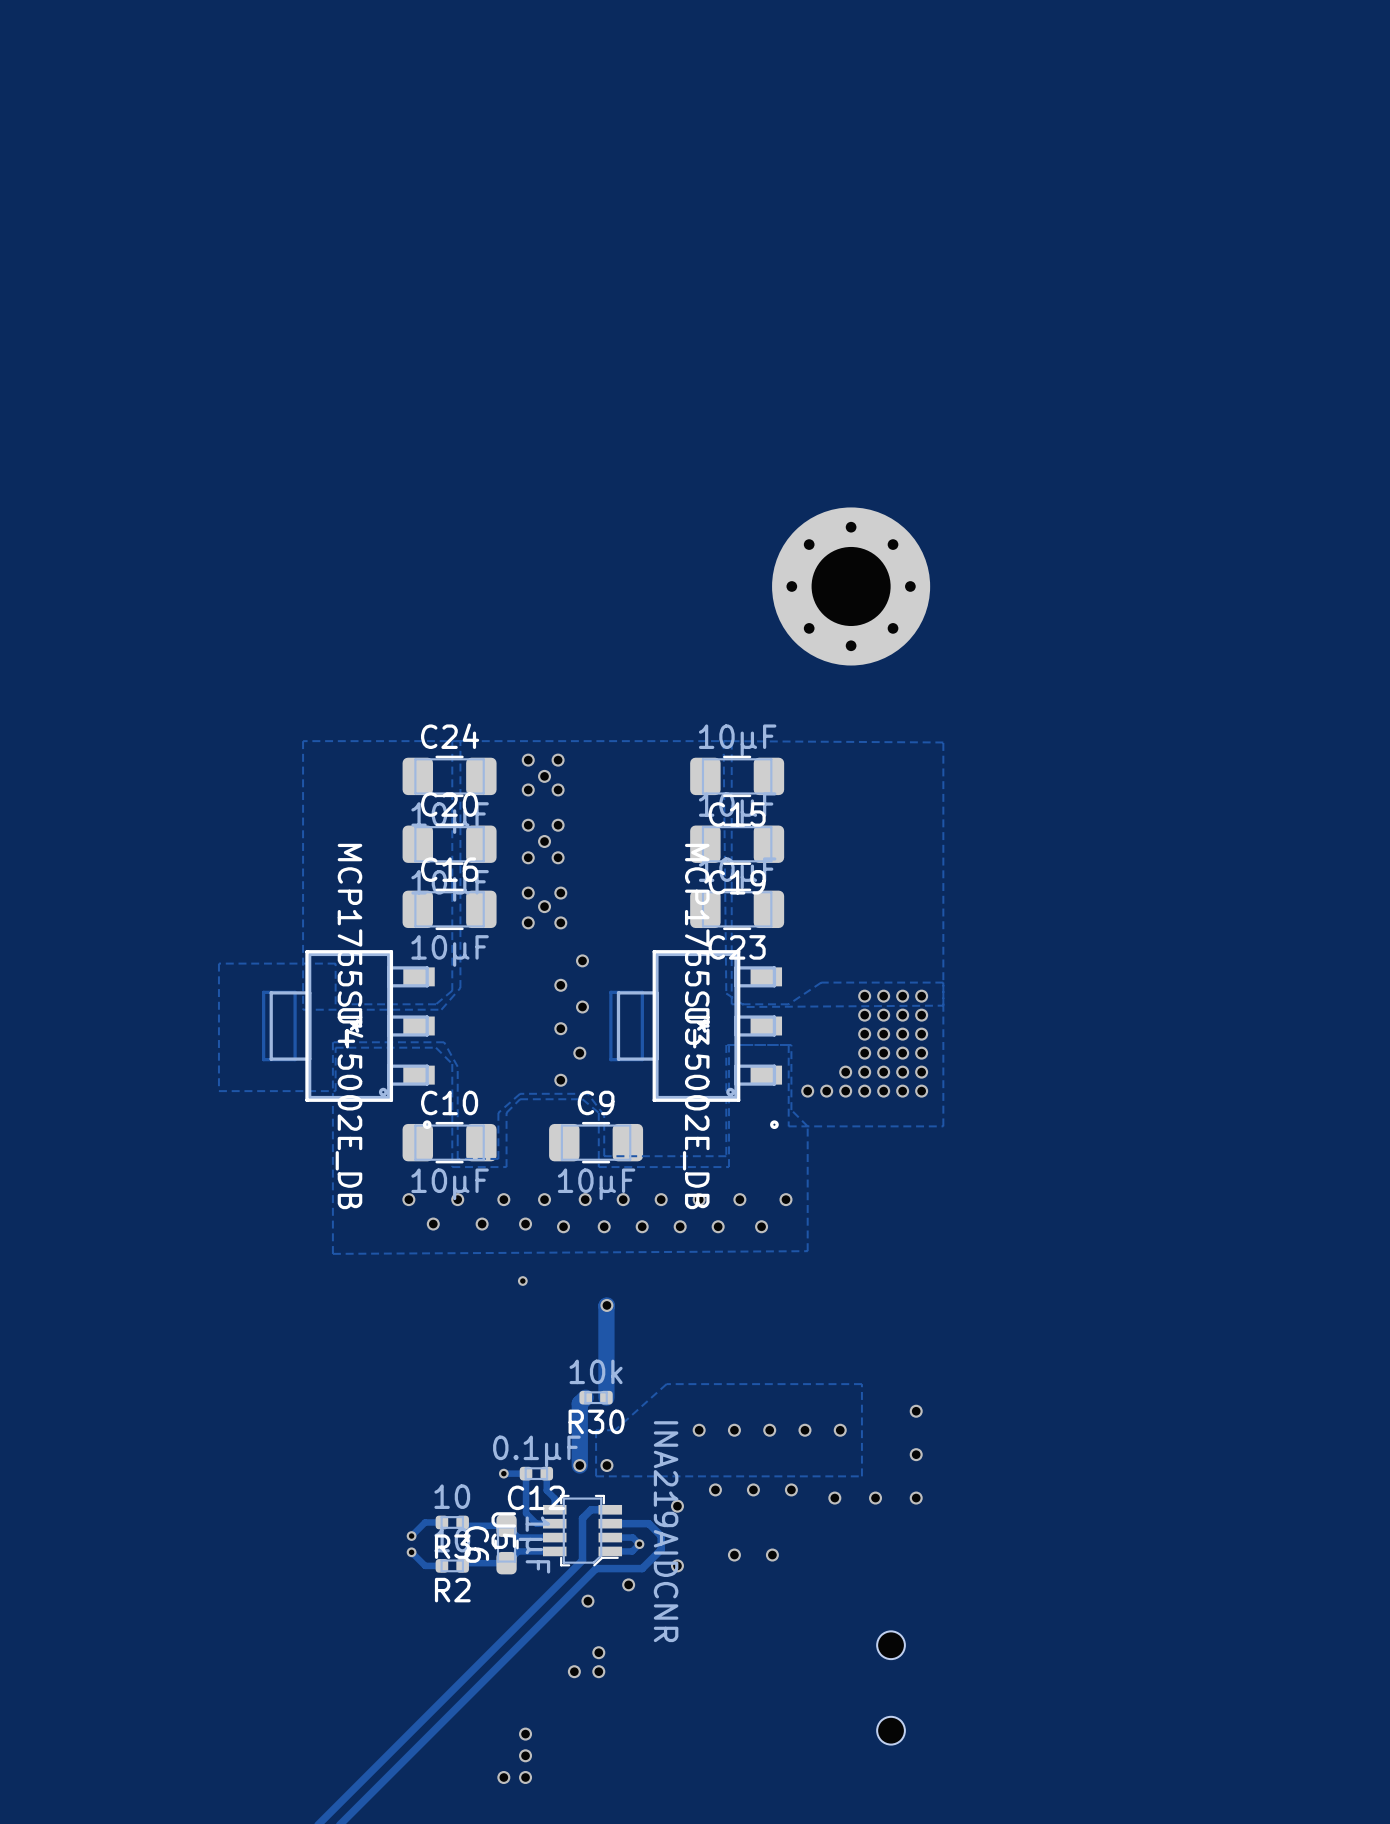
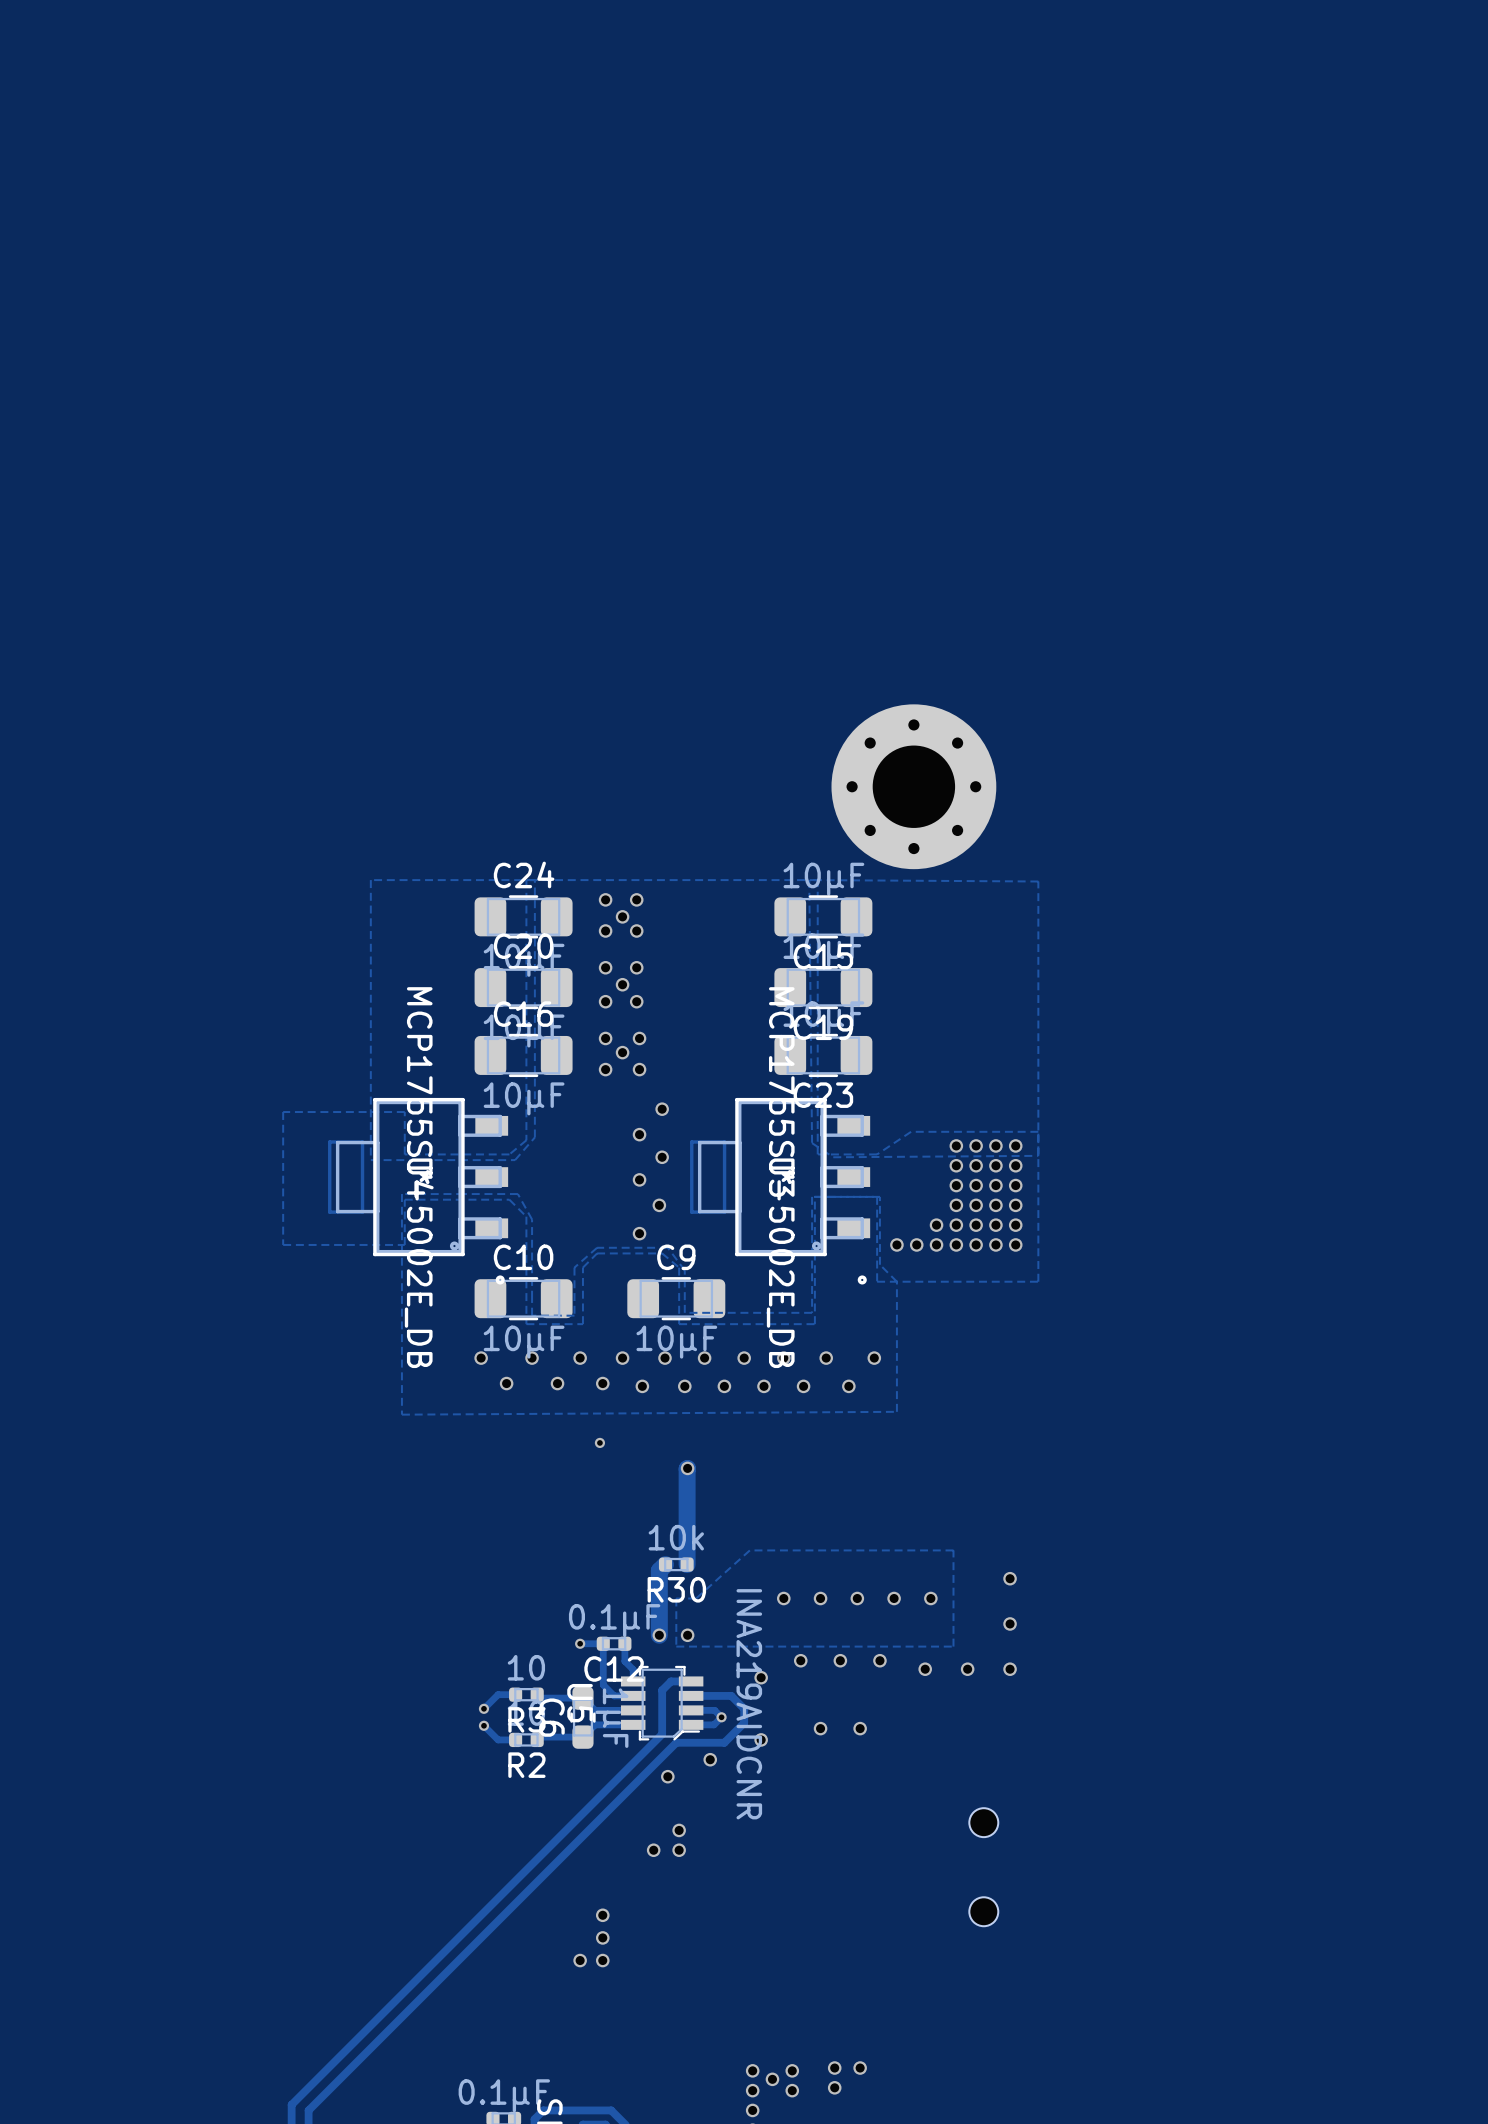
part position: (851, 586) -> (913, 786)

